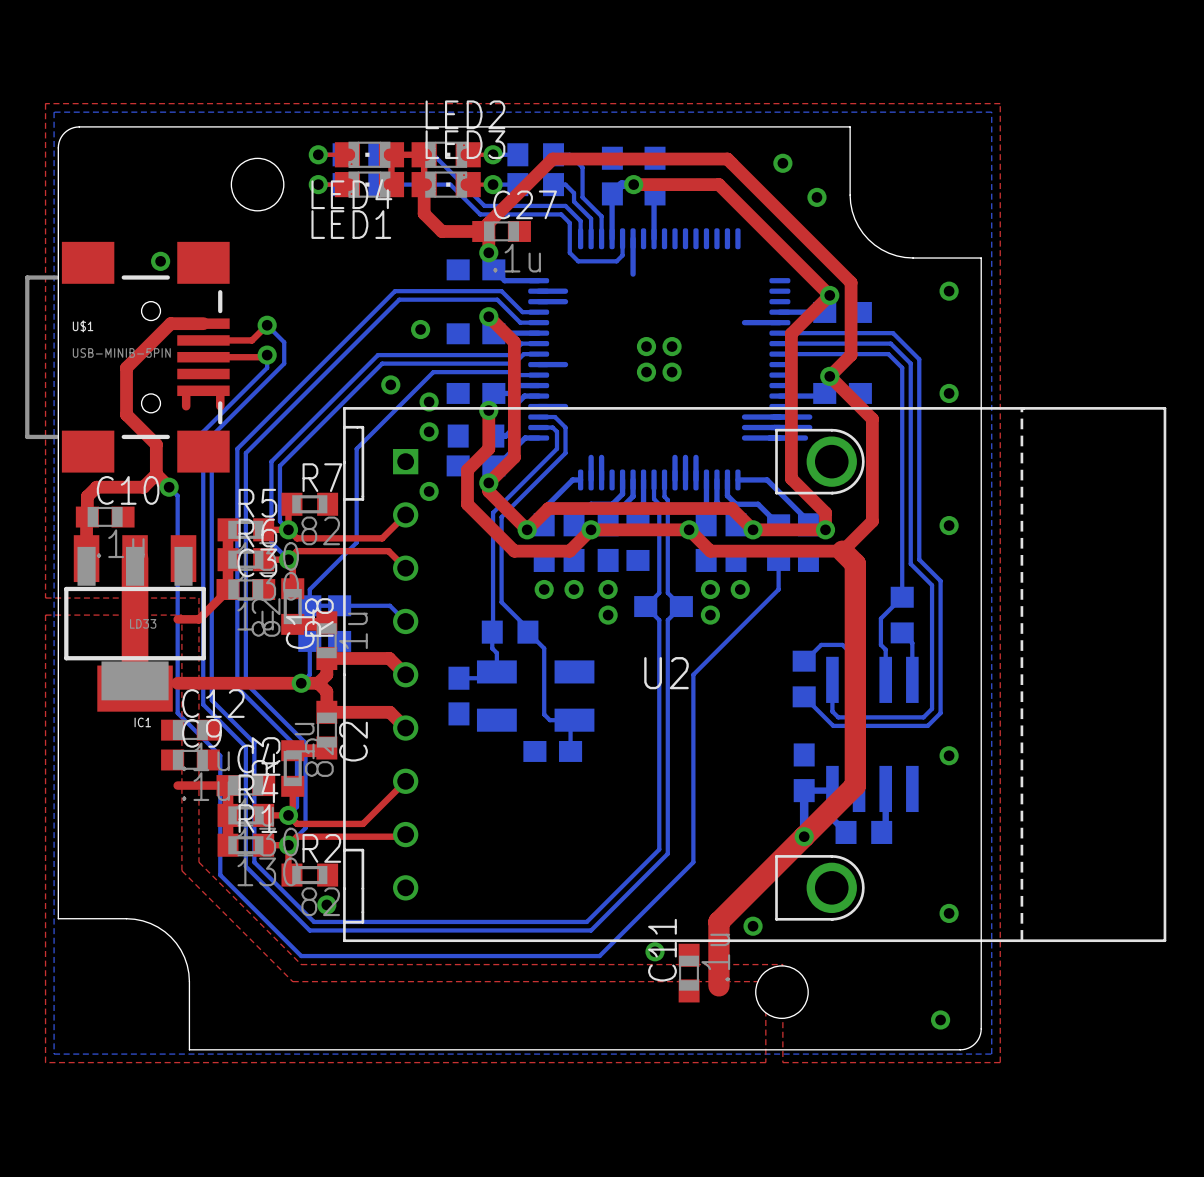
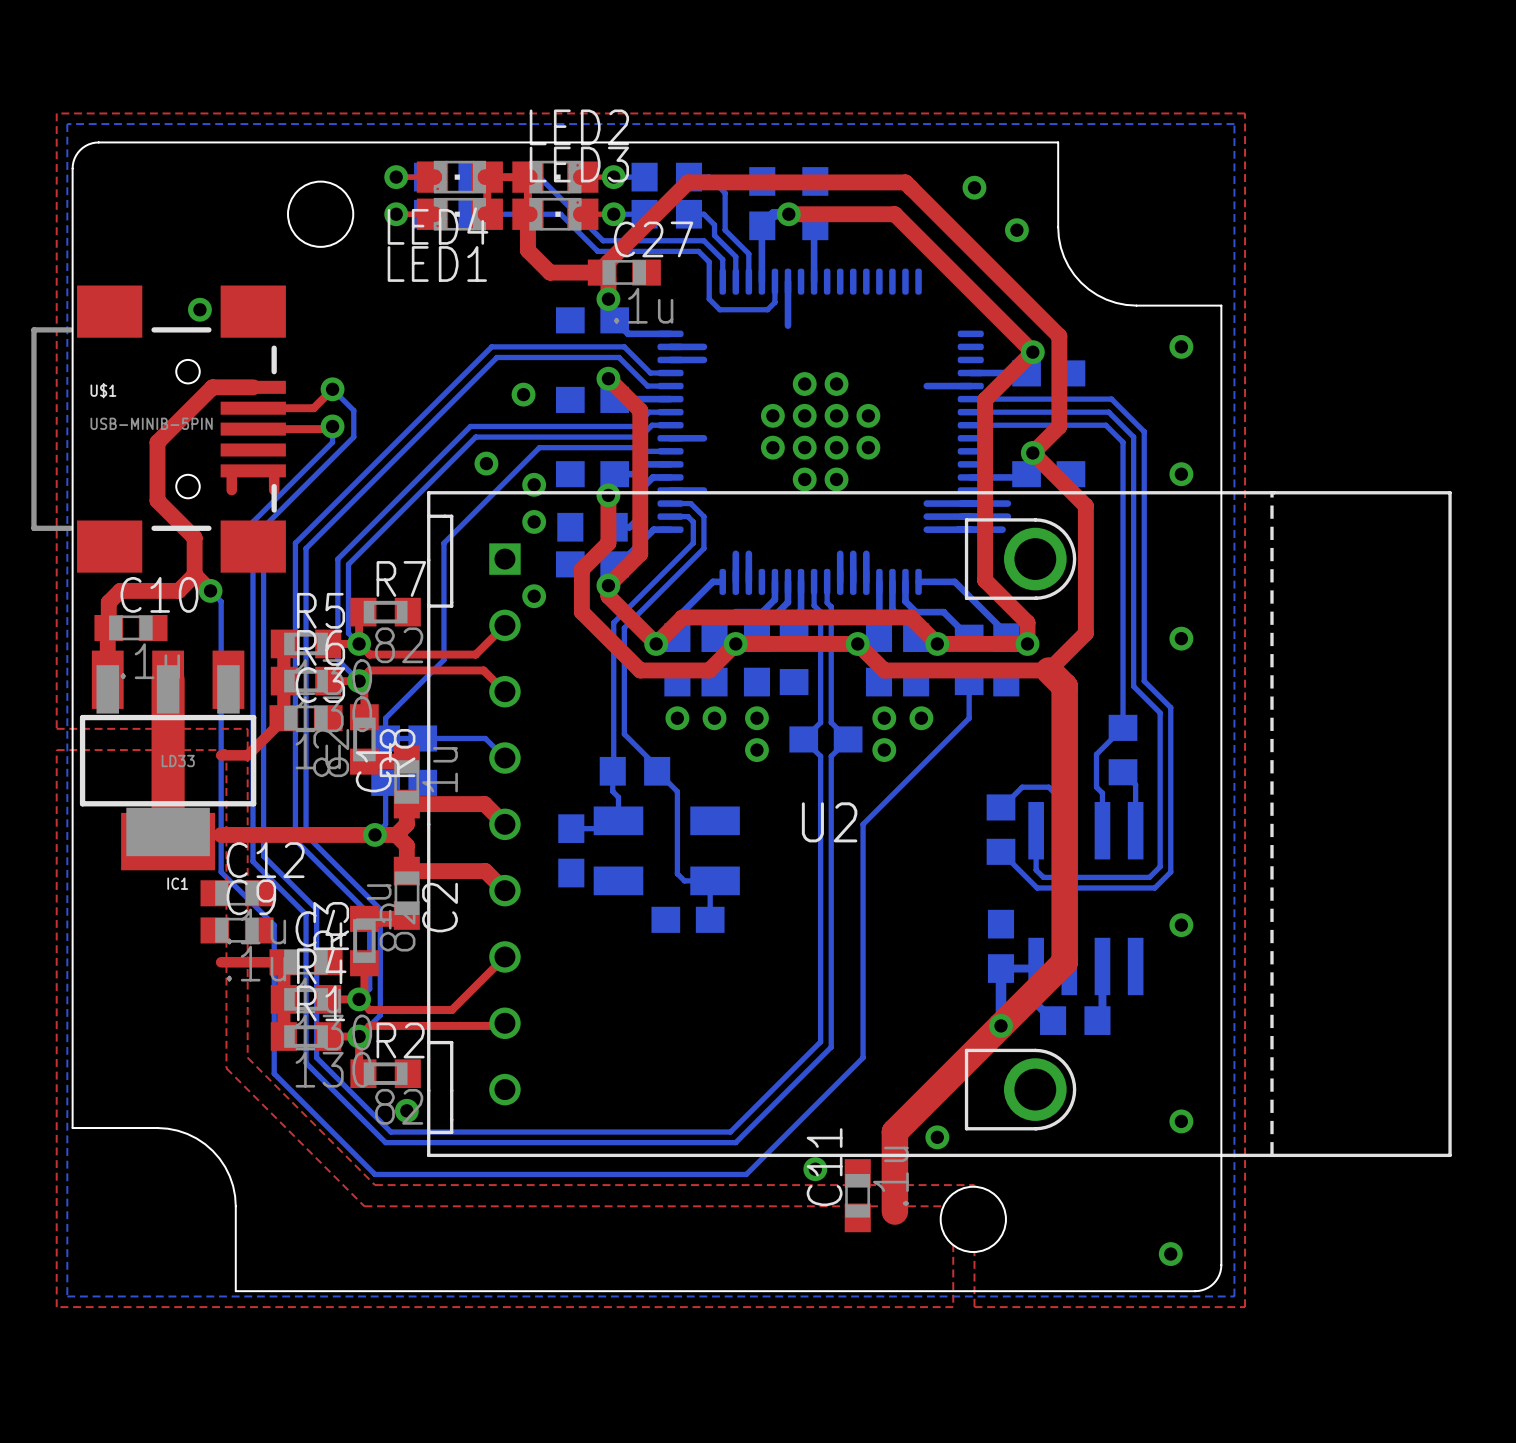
via: none -> (804, 384)
via: none -> (836, 384)
via: none -> (772, 415)
via: none -> (868, 415)
via: none -> (772, 447)
via: none -> (868, 447)
via: none -> (804, 479)
via: none -> (836, 479)

